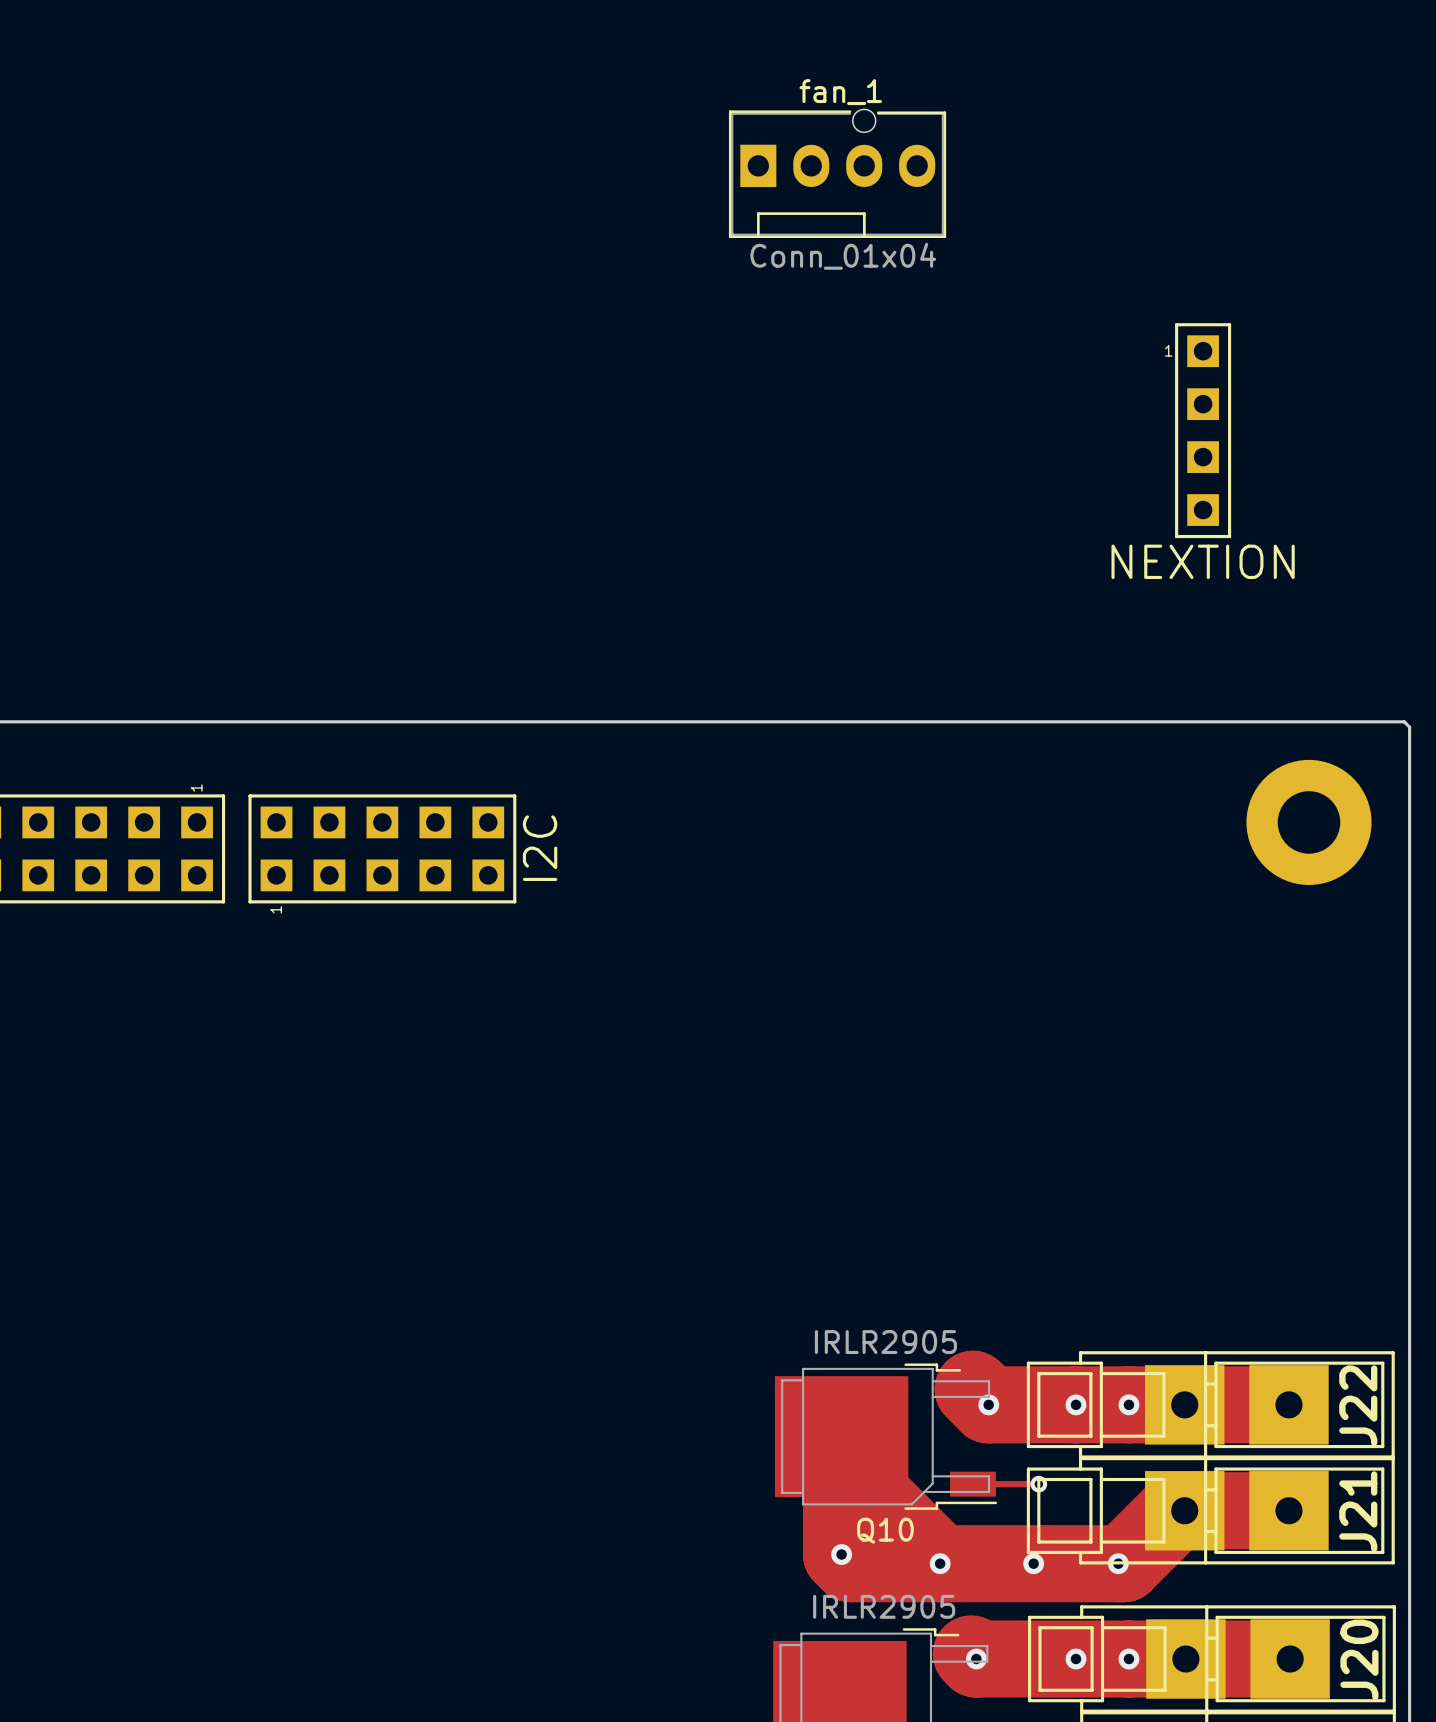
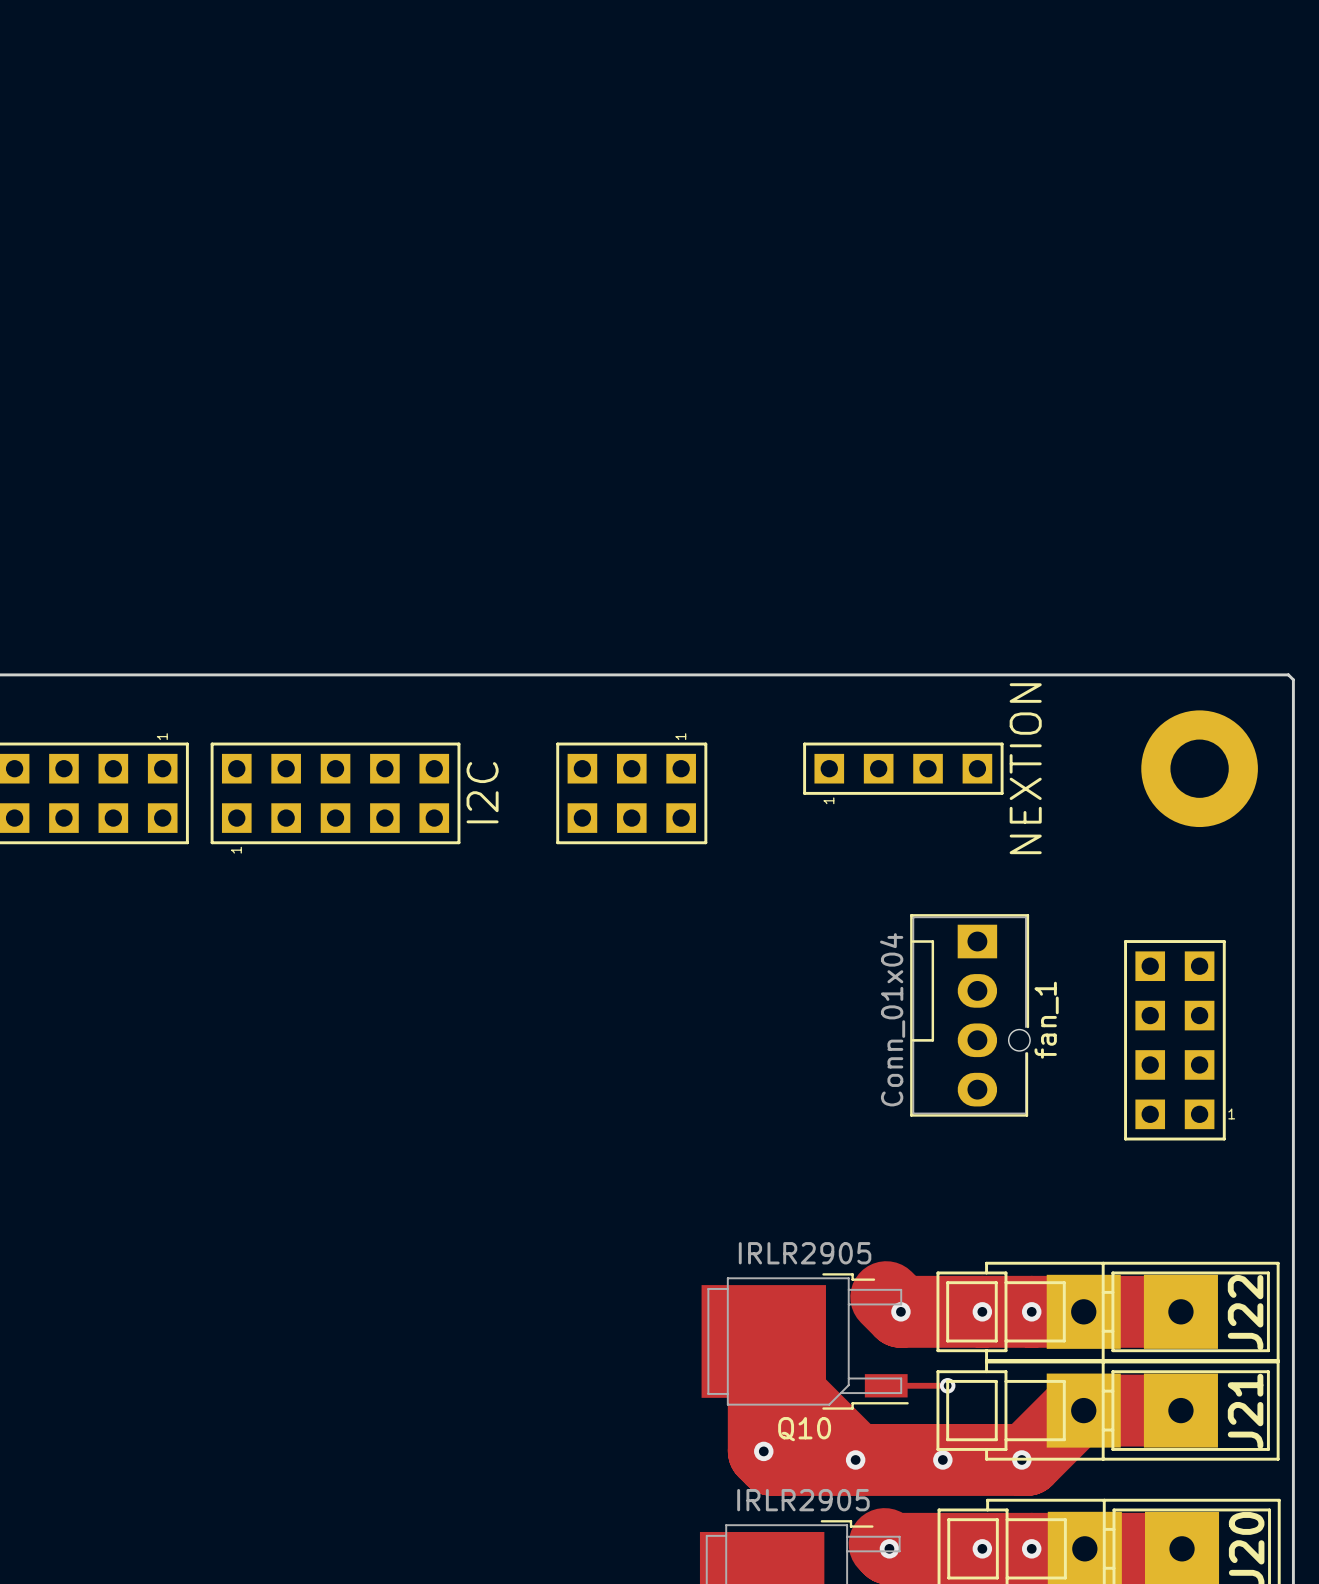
fan_1 rotation: 0° (837, 173) -> 90° clockwise (970, 1015)
fan_1 position: (837, 173) -> (970, 1015)
part rotation: 0° (1203, 430) -> 90° counterclockwise (903, 768)
part position: (1203, 430) -> (903, 768)
part: none -> (631, 793)
part: none -> (1174, 1040)

